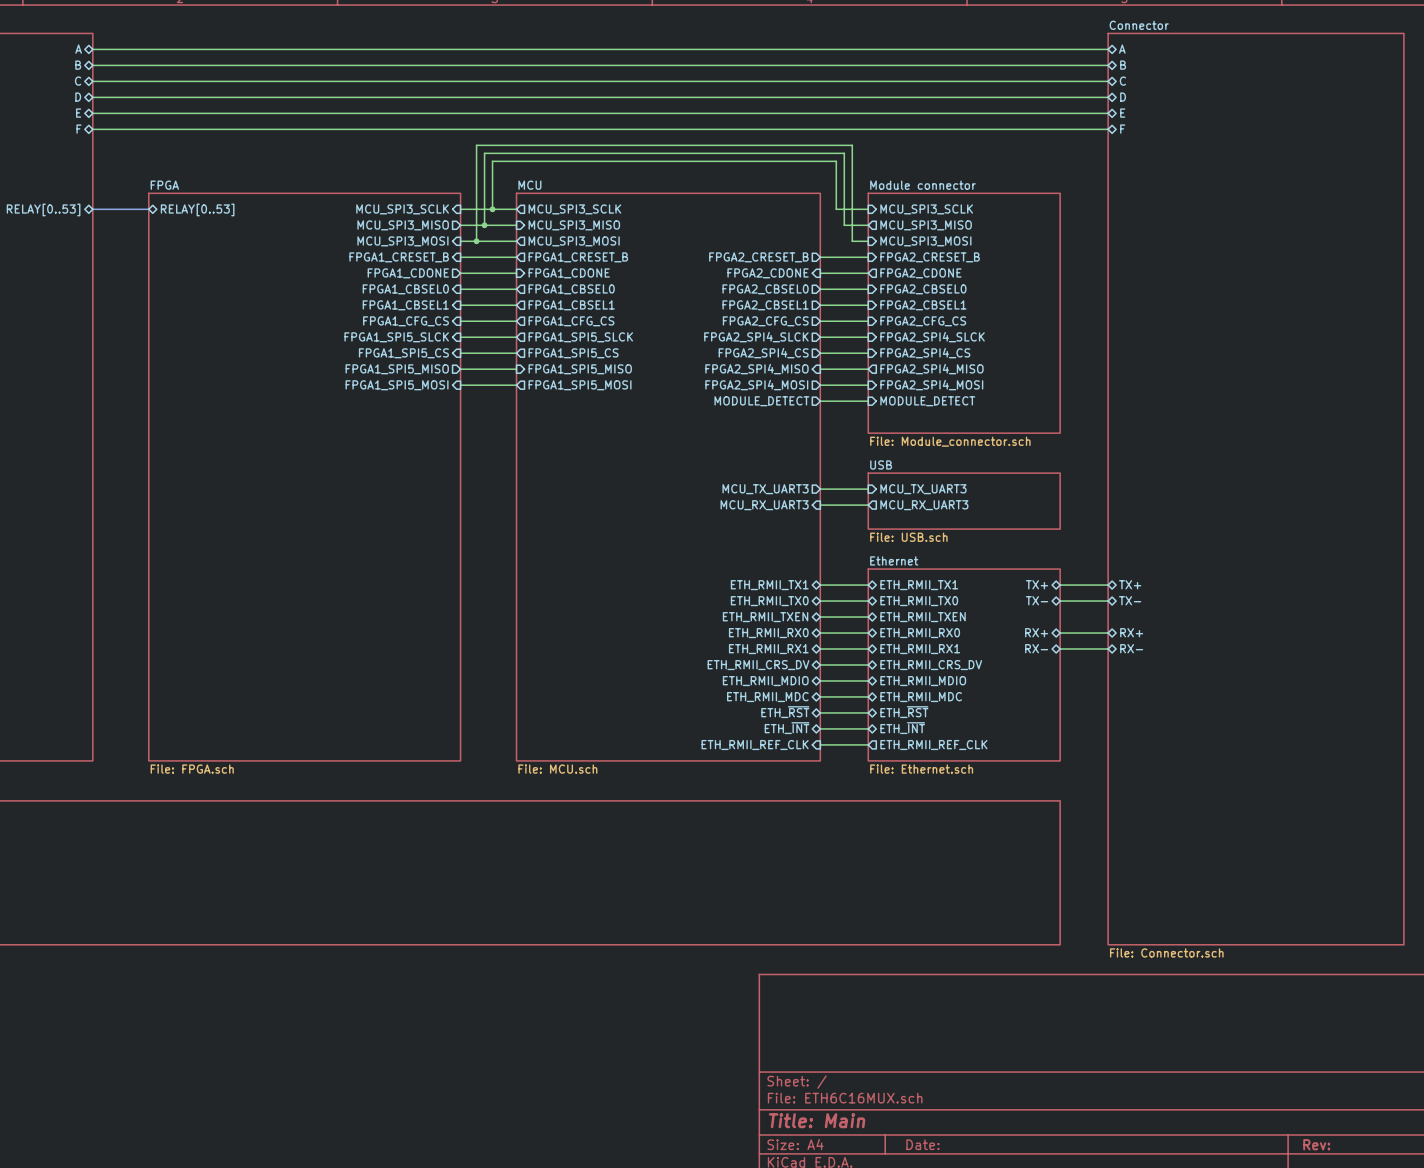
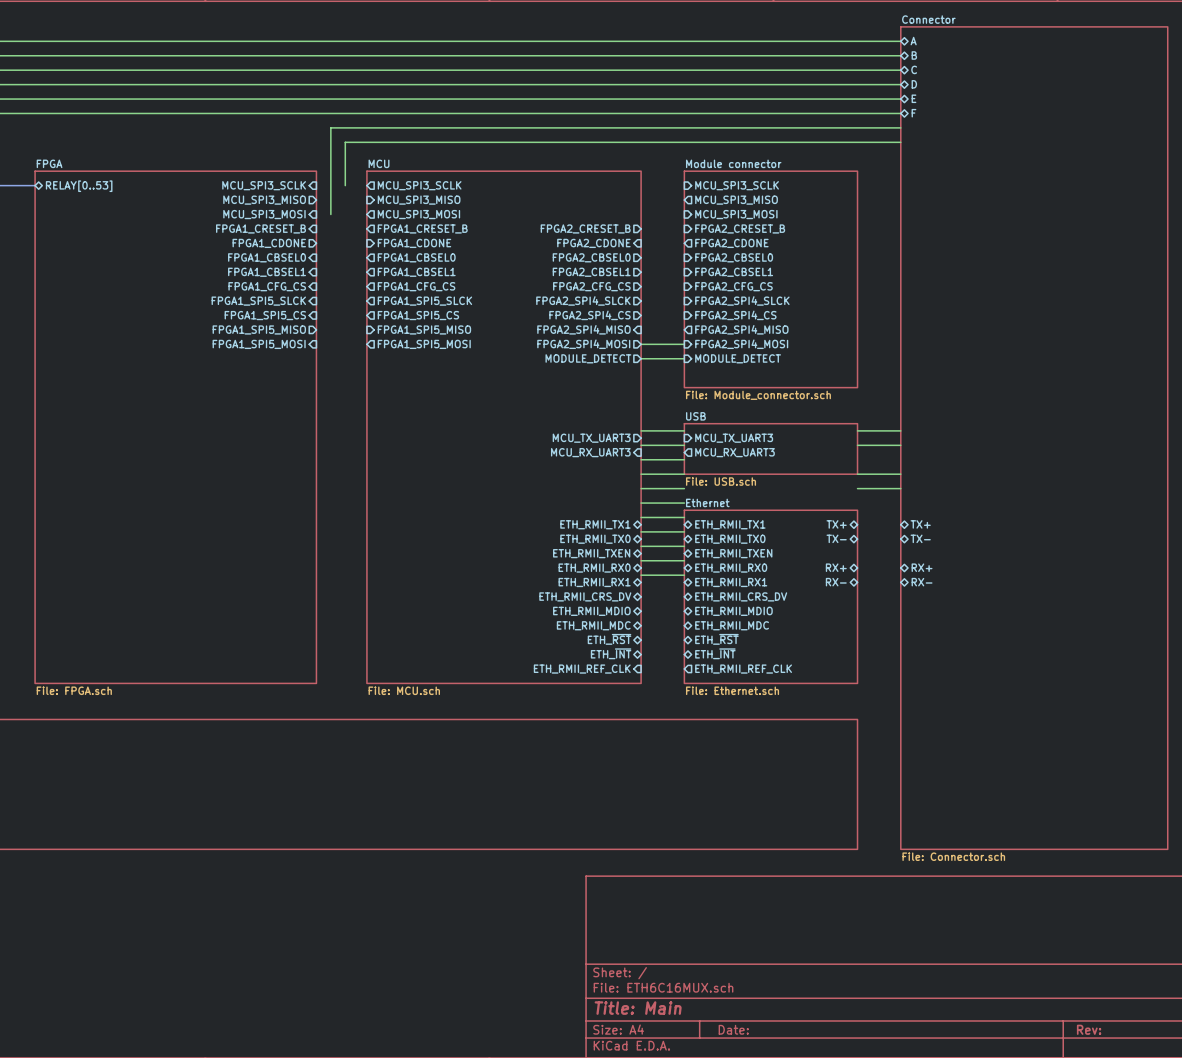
wire: (852, 145) (852, 241) (868, 241) -> (669, 127) (900, 127)
wire: (836, 161) (836, 209) (868, 209) -> (655, 142) (900, 142)
wire: (460, 209) (516, 209) -> none
junction: (492, 209) -> none
wire: (460, 225) (516, 225) -> none
wire: (484, 225) (484, 153) (844, 153) (844, 225) (868, 225) -> none
junction: (484, 225) -> none
wire: (460, 241) (516, 241) -> none
junction: (476, 241) -> none
wire: (460, 257) (516, 257) -> none
wire: (820, 257) (868, 257) -> none
wire: (460, 273) (516, 273) -> none
wire: (820, 273) (868, 273) -> none
wire: (460, 289) (516, 289) -> none
wire: (820, 289) (868, 289) -> none
wire: (460, 305) (516, 305) -> none
wire: (820, 305) (868, 305) -> none
wire: (460, 321) (516, 321) -> none
wire: (820, 321) (868, 321) -> none
wire: (460, 337) (516, 337) -> none
wire: (820, 337) (868, 337) -> none
wire: (460, 353) (516, 353) -> none
wire: (820, 353) (868, 353) -> none
wire: (460, 369) (516, 369) -> none
wire: (820, 369) (868, 369) -> none
wire: (460, 385) (516, 385) -> none
wire: (820, 489) (868, 489) -> none
wire: (820, 505) (868, 505) -> none
wire: (820, 585) (868, 585) -> (641, 430) (684, 430)
wire: (1060, 585) (1108, 585) -> (857, 430) (900, 430)
wire: (820, 601) (868, 601) -> (641, 445) (684, 445)
wire: (1060, 601) (1108, 601) -> (857, 445) (900, 445)
wire: (820, 617) (868, 617) -> (641, 459) (684, 459)
wire: (820, 633) (868, 633) -> (641, 474) (684, 474)
wire: (1060, 633) (1108, 633) -> (857, 474) (900, 474)
wire: (820, 649) (868, 649) -> (641, 488) (684, 488)
wire: (1060, 649) (1108, 649) -> (857, 488) (900, 488)
wire: (820, 664) (868, 664) -> (641, 503) (684, 503)
wire: (820, 680) (868, 680) -> (641, 517) (684, 517)
wire: (820, 696) (868, 696) -> (641, 531) (684, 531)
wire: (820, 712) (868, 712) -> (641, 546) (684, 546)
wire: (820, 728) (868, 728) -> (641, 560) (684, 560)
wire: (820, 744) (868, 744) -> (641, 575) (684, 575)

